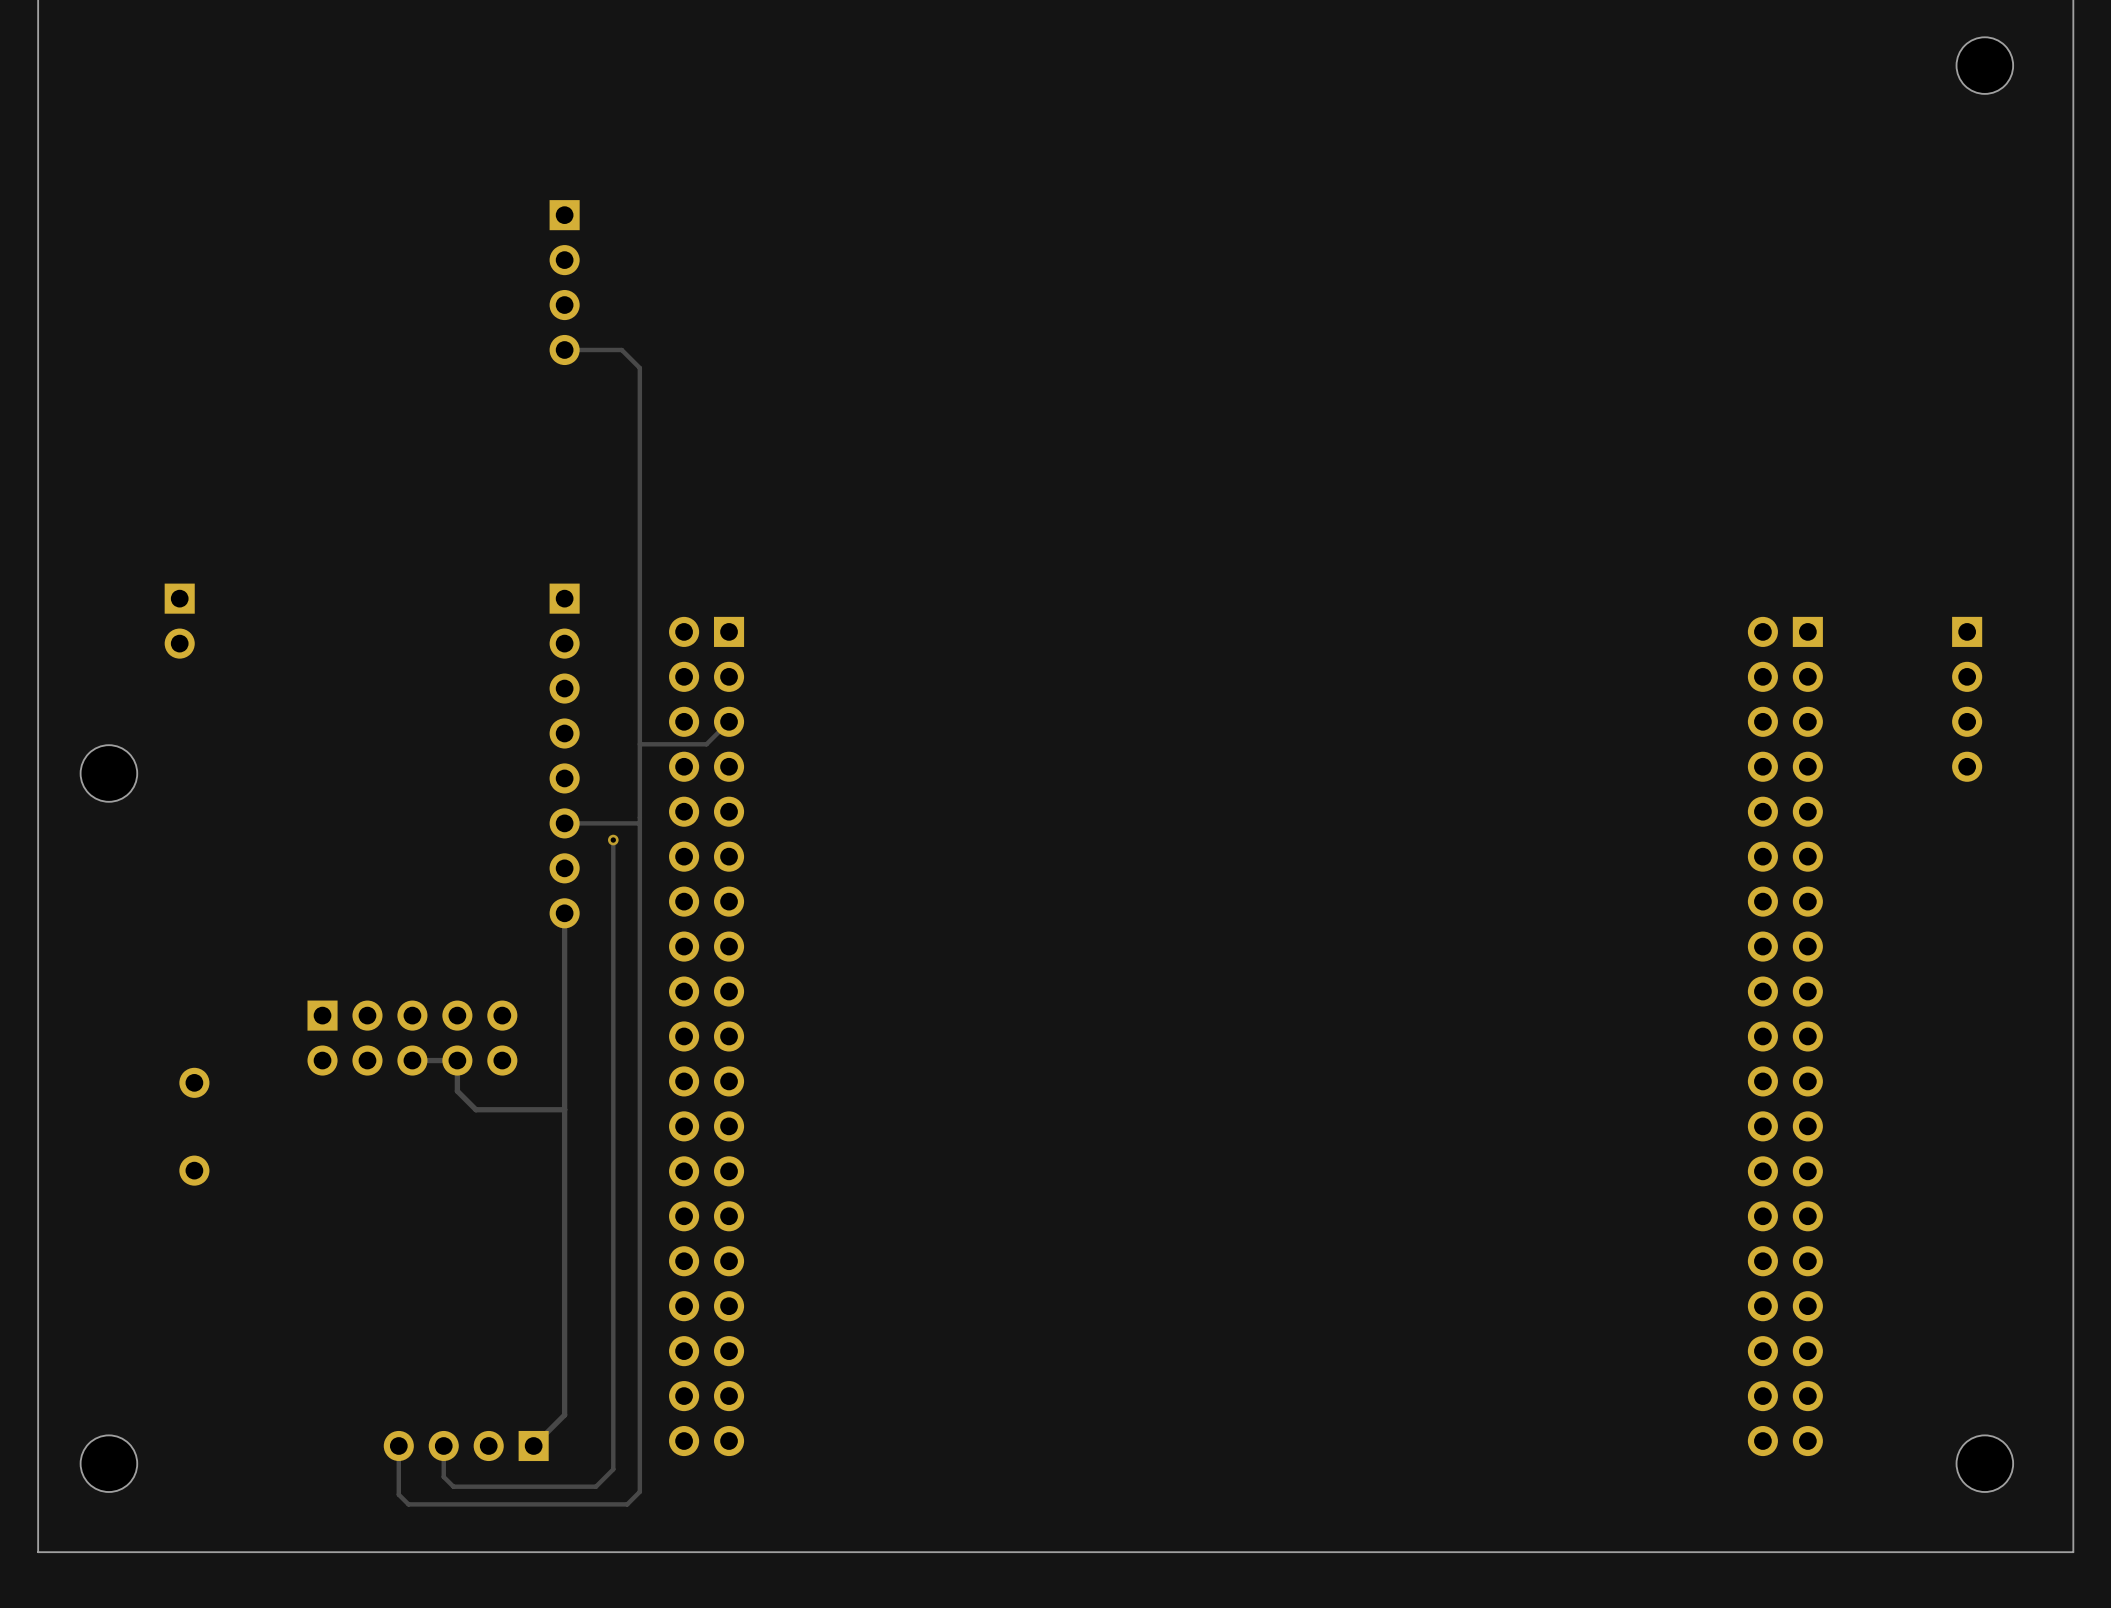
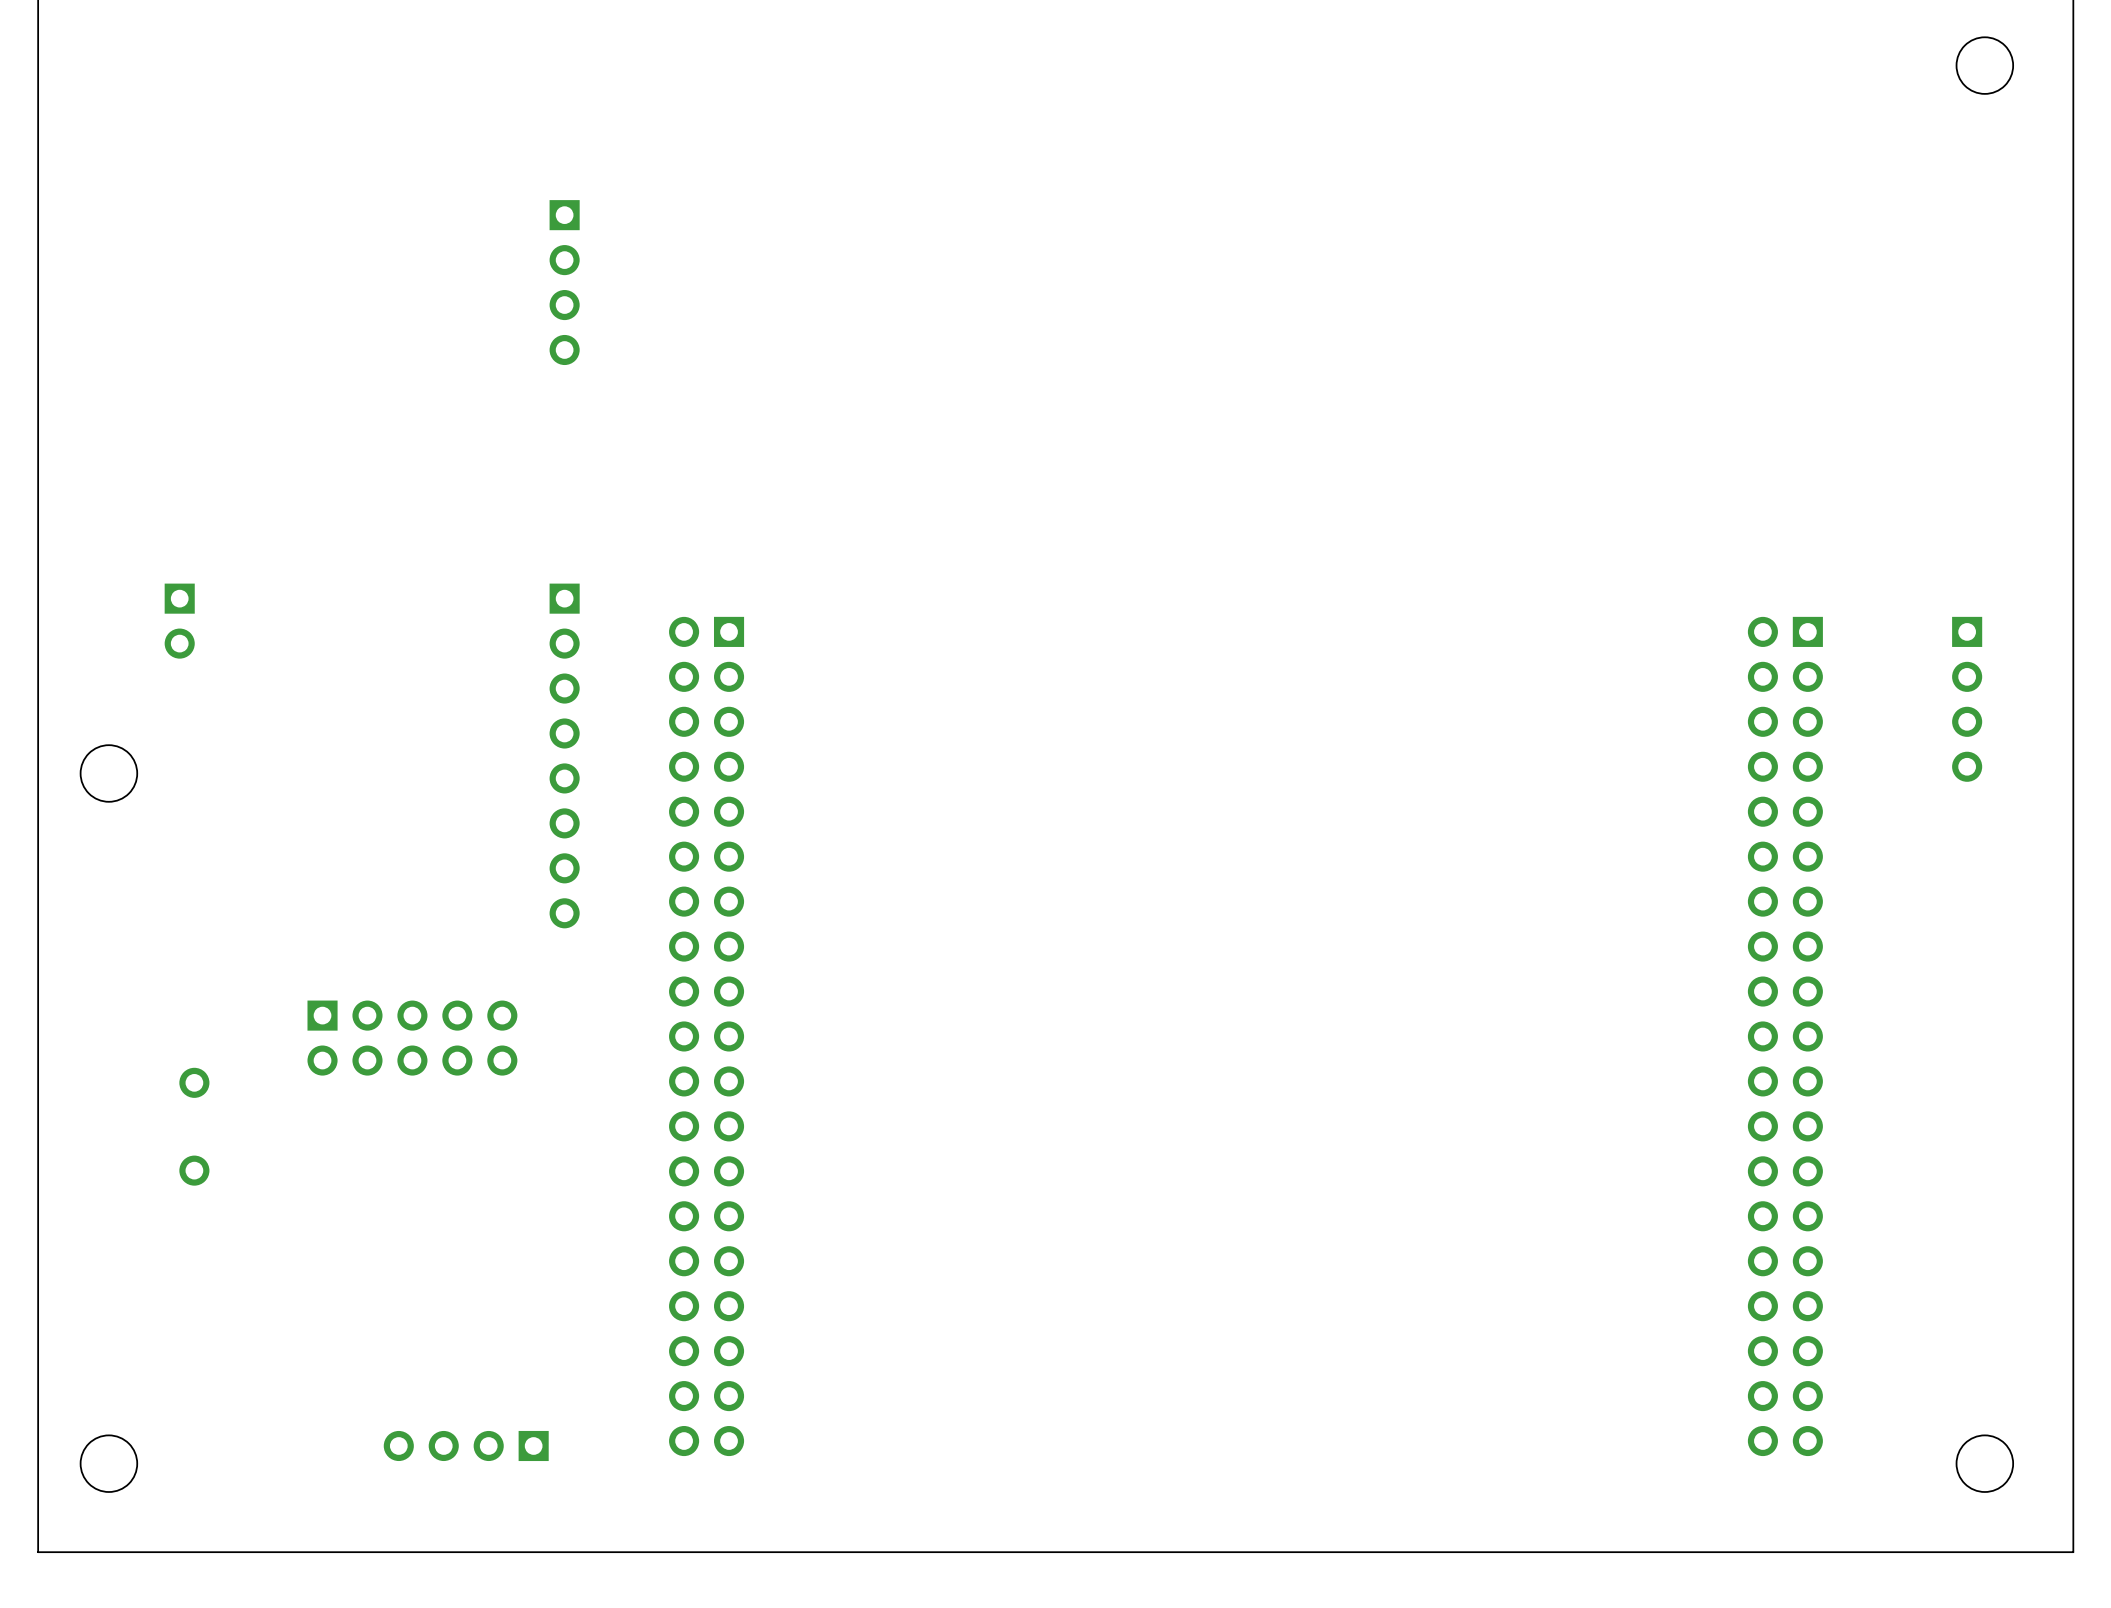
track: (564, 349) (621, 349) (639, 368) (639, 1491) (627, 1504) (408, 1504) (398, 1494) (398, 1445) -> none
track: (729, 721) (706, 744) (639, 744) -> none
track: (639, 823) (564, 823) -> none
track: (613, 840) (613, 1469) (595, 1486) (453, 1486) (443, 1476) (443, 1445) -> none
via: (613, 840) -> none
track: (564, 913) (564, 1415) (533, 1445) -> none
track: (412, 1060) (457, 1060) (457, 1091) (475, 1109) (564, 1109) -> none

